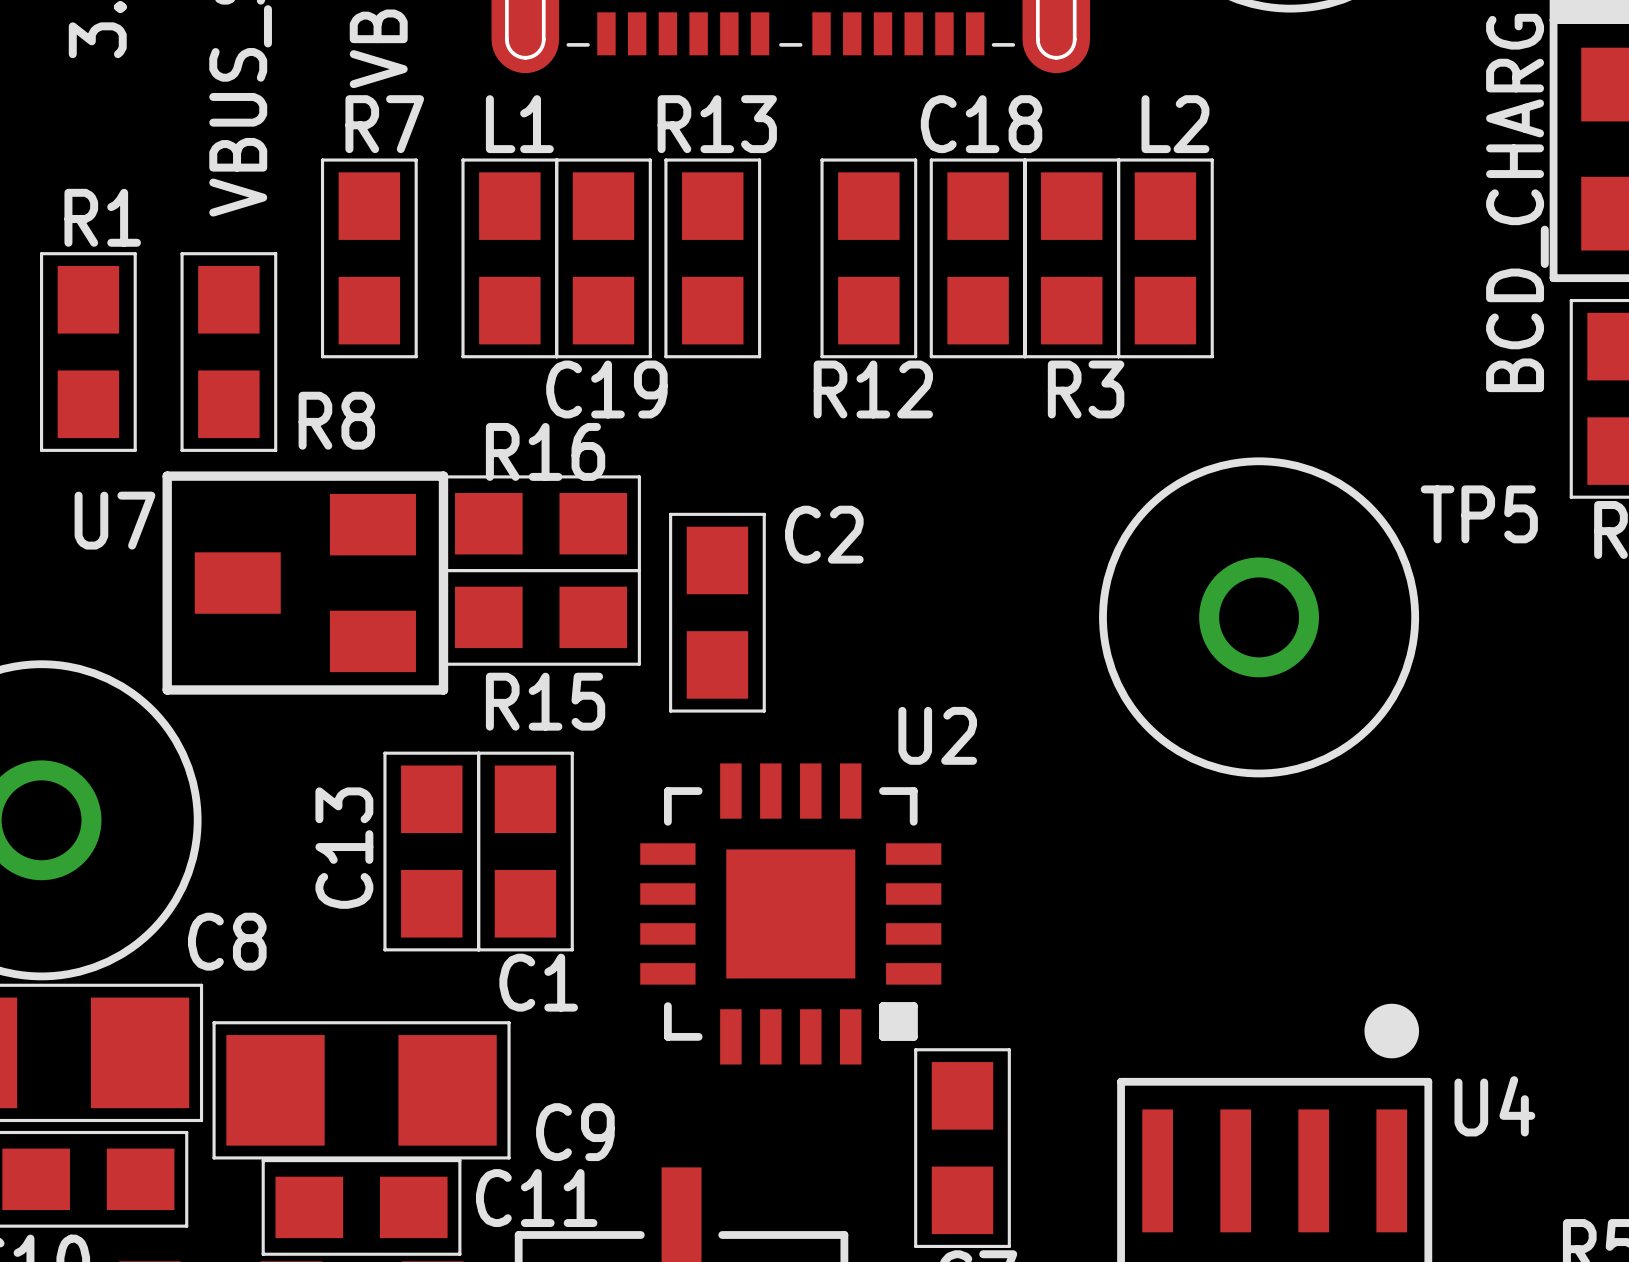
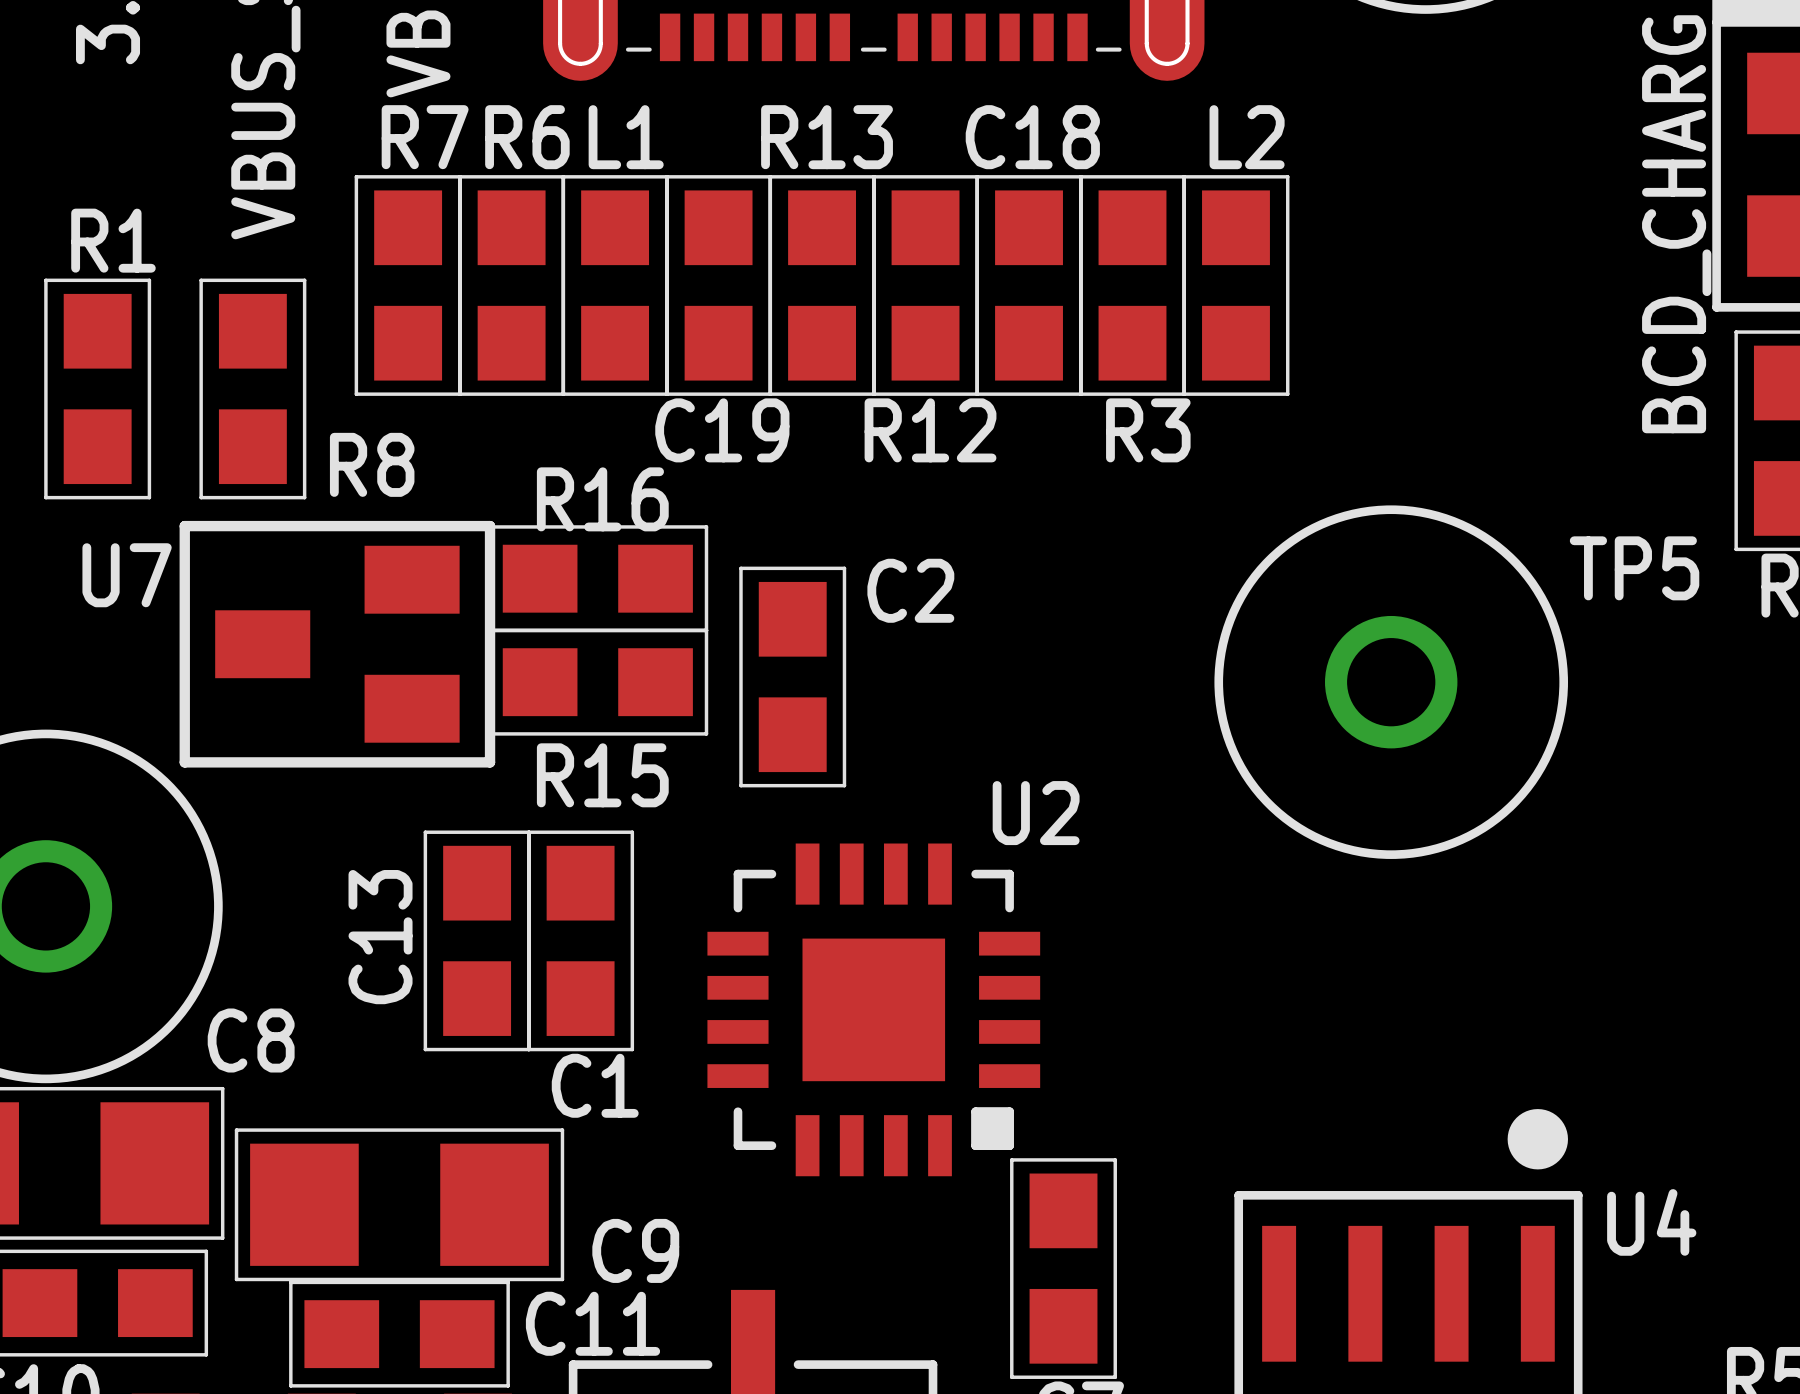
R6: none -> (511, 285)
L1 position: (509, 258) -> (615, 285)
C19 position: (603, 258) -> (718, 285)
R13 position: (712, 258) -> (822, 285)
R12 position: (868, 258) -> (925, 285)
C18 position: (978, 258) -> (1029, 285)
R3 position: (1071, 258) -> (1132, 285)
L2 position: (1165, 258) -> (1235, 285)

